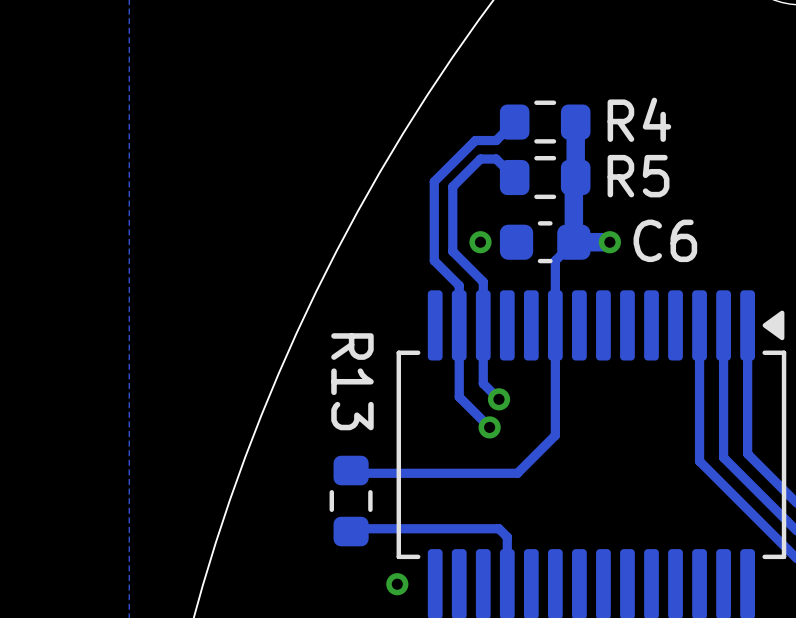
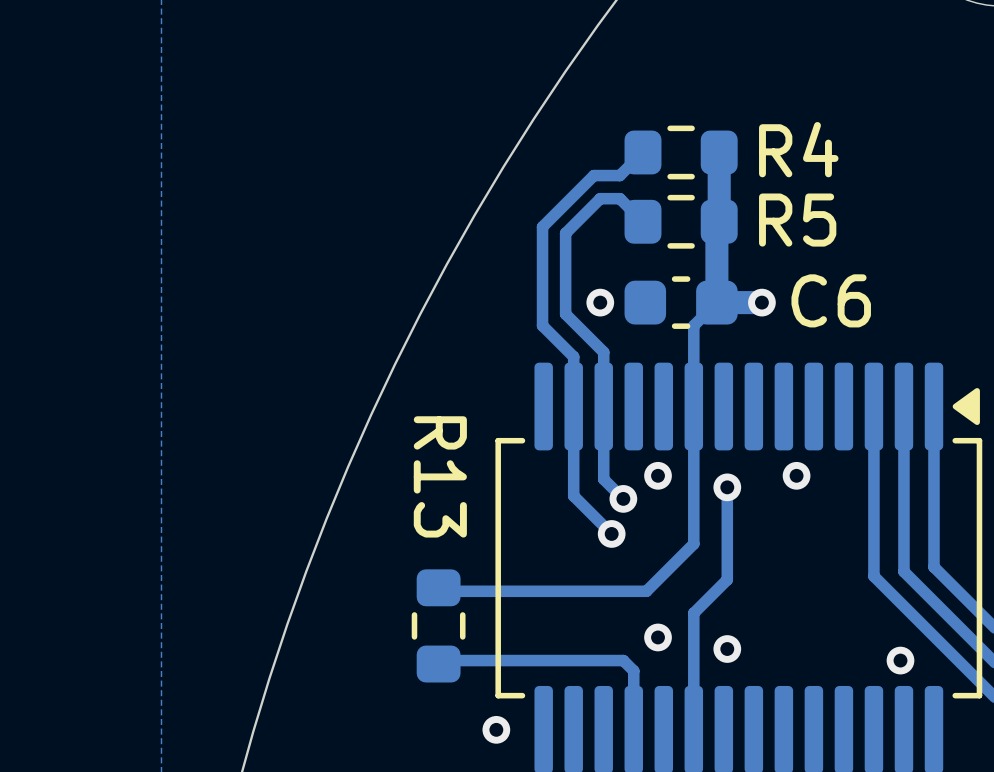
via: none -> (658, 475)
via: none -> (796, 475)
track: none -> (727, 487) (727, 579) (693, 613) (693, 729)
via: none -> (727, 487)
via: none -> (658, 637)
via: none -> (727, 649)
via: none -> (900, 660)

